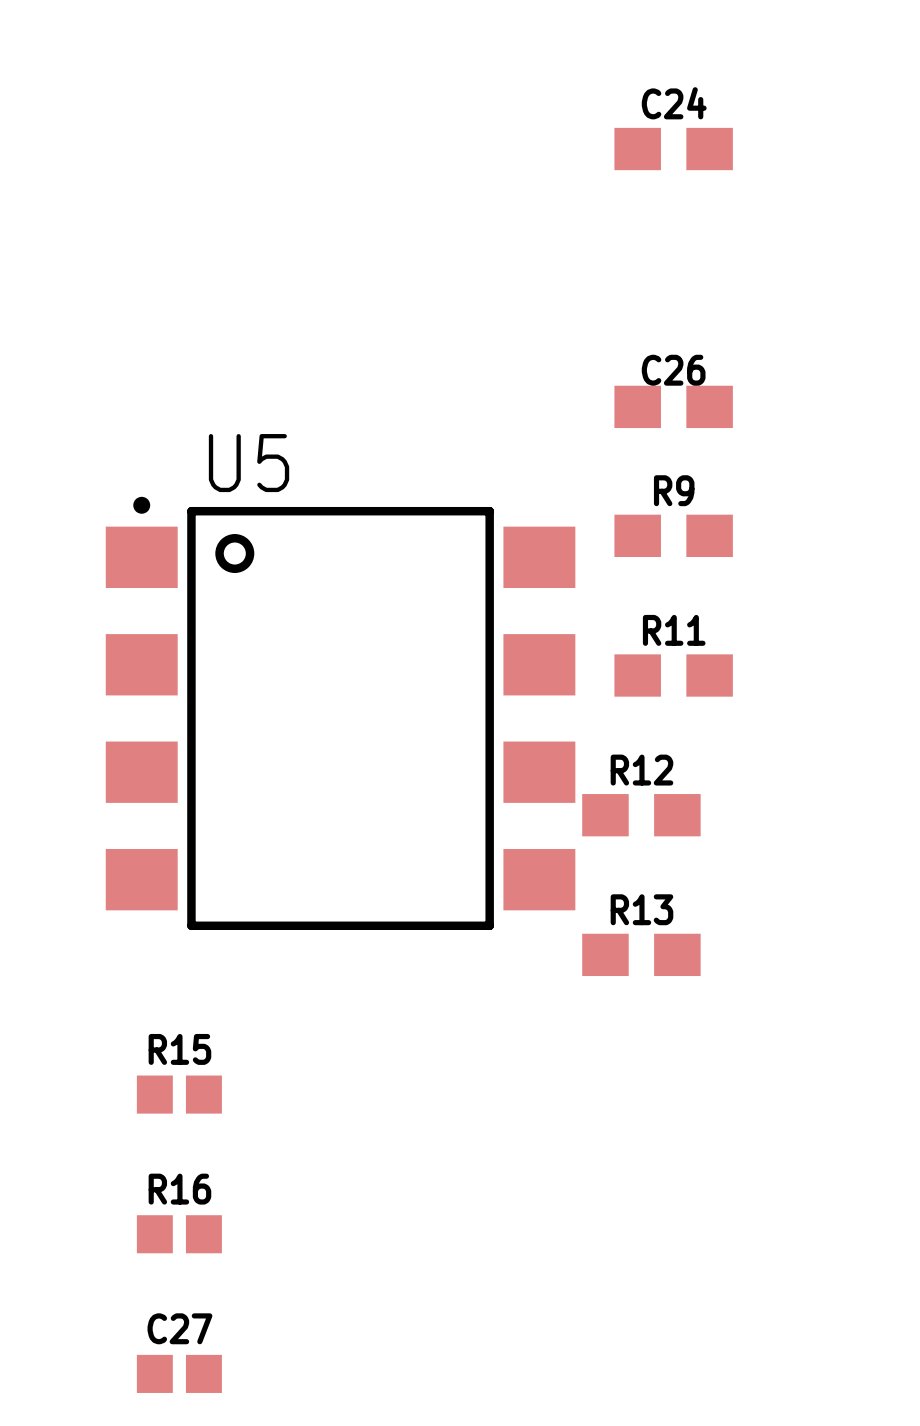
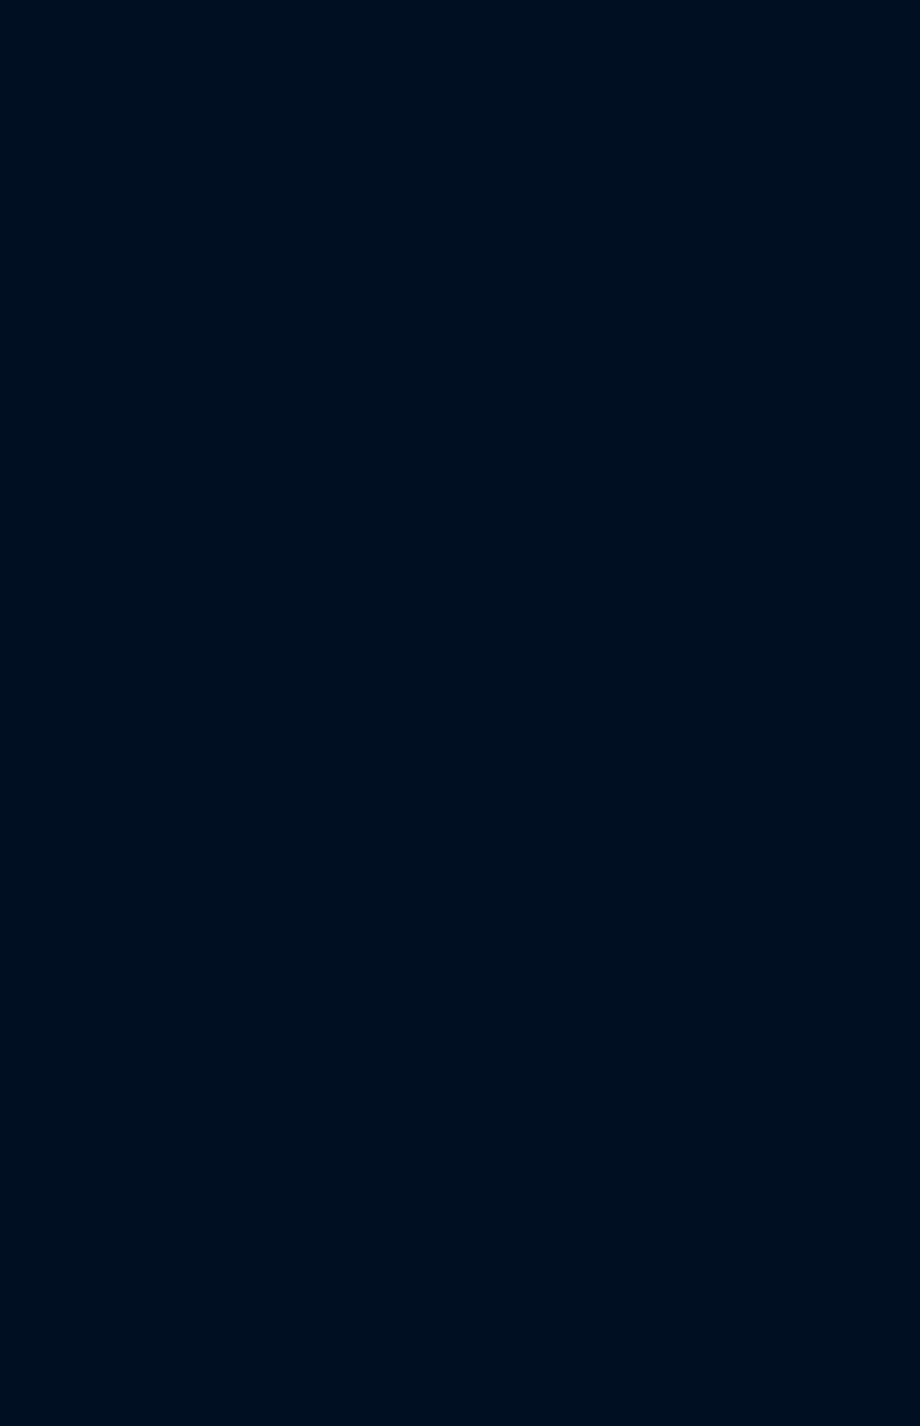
C24: (673, 149) -> none
C26: (673, 406) -> none
R9: (673, 535) -> none
R11: (673, 675) -> none
U5: (340, 713) -> none
R12: (641, 815) -> none
R13: (641, 954) -> none
R15: (179, 1094) -> none
R16: (179, 1234) -> none
C27: (179, 1373) -> none

